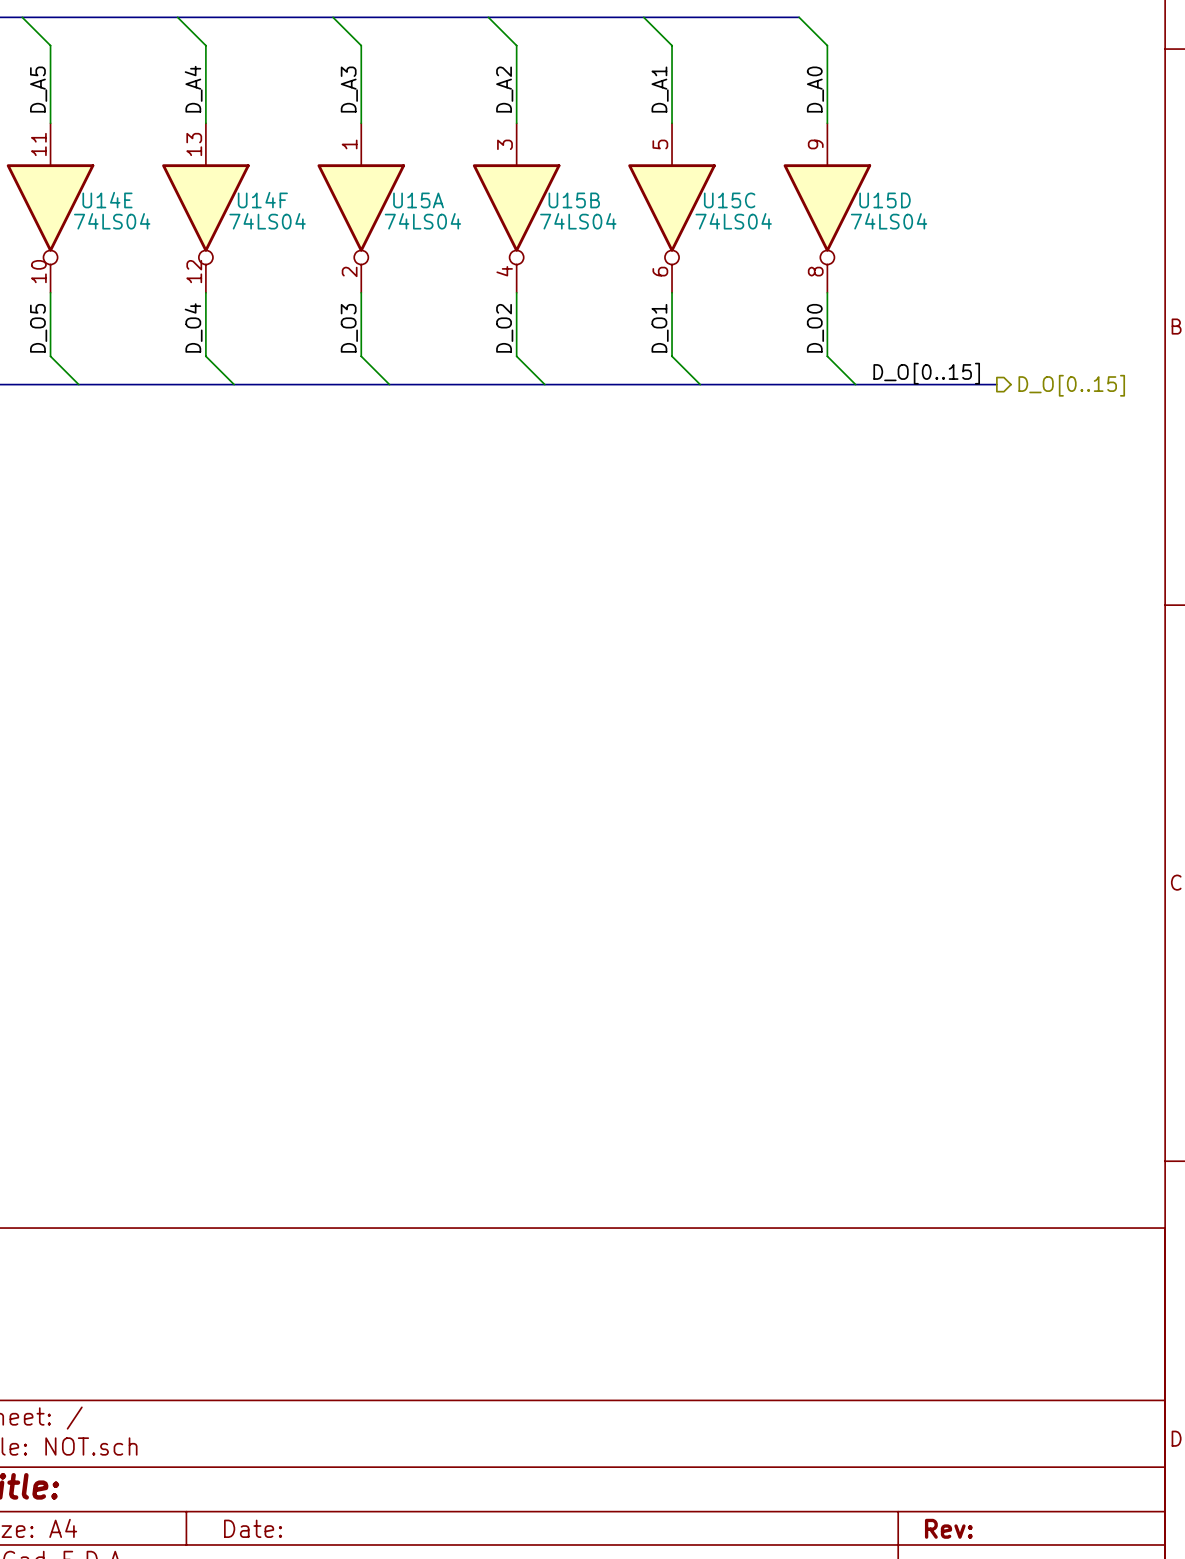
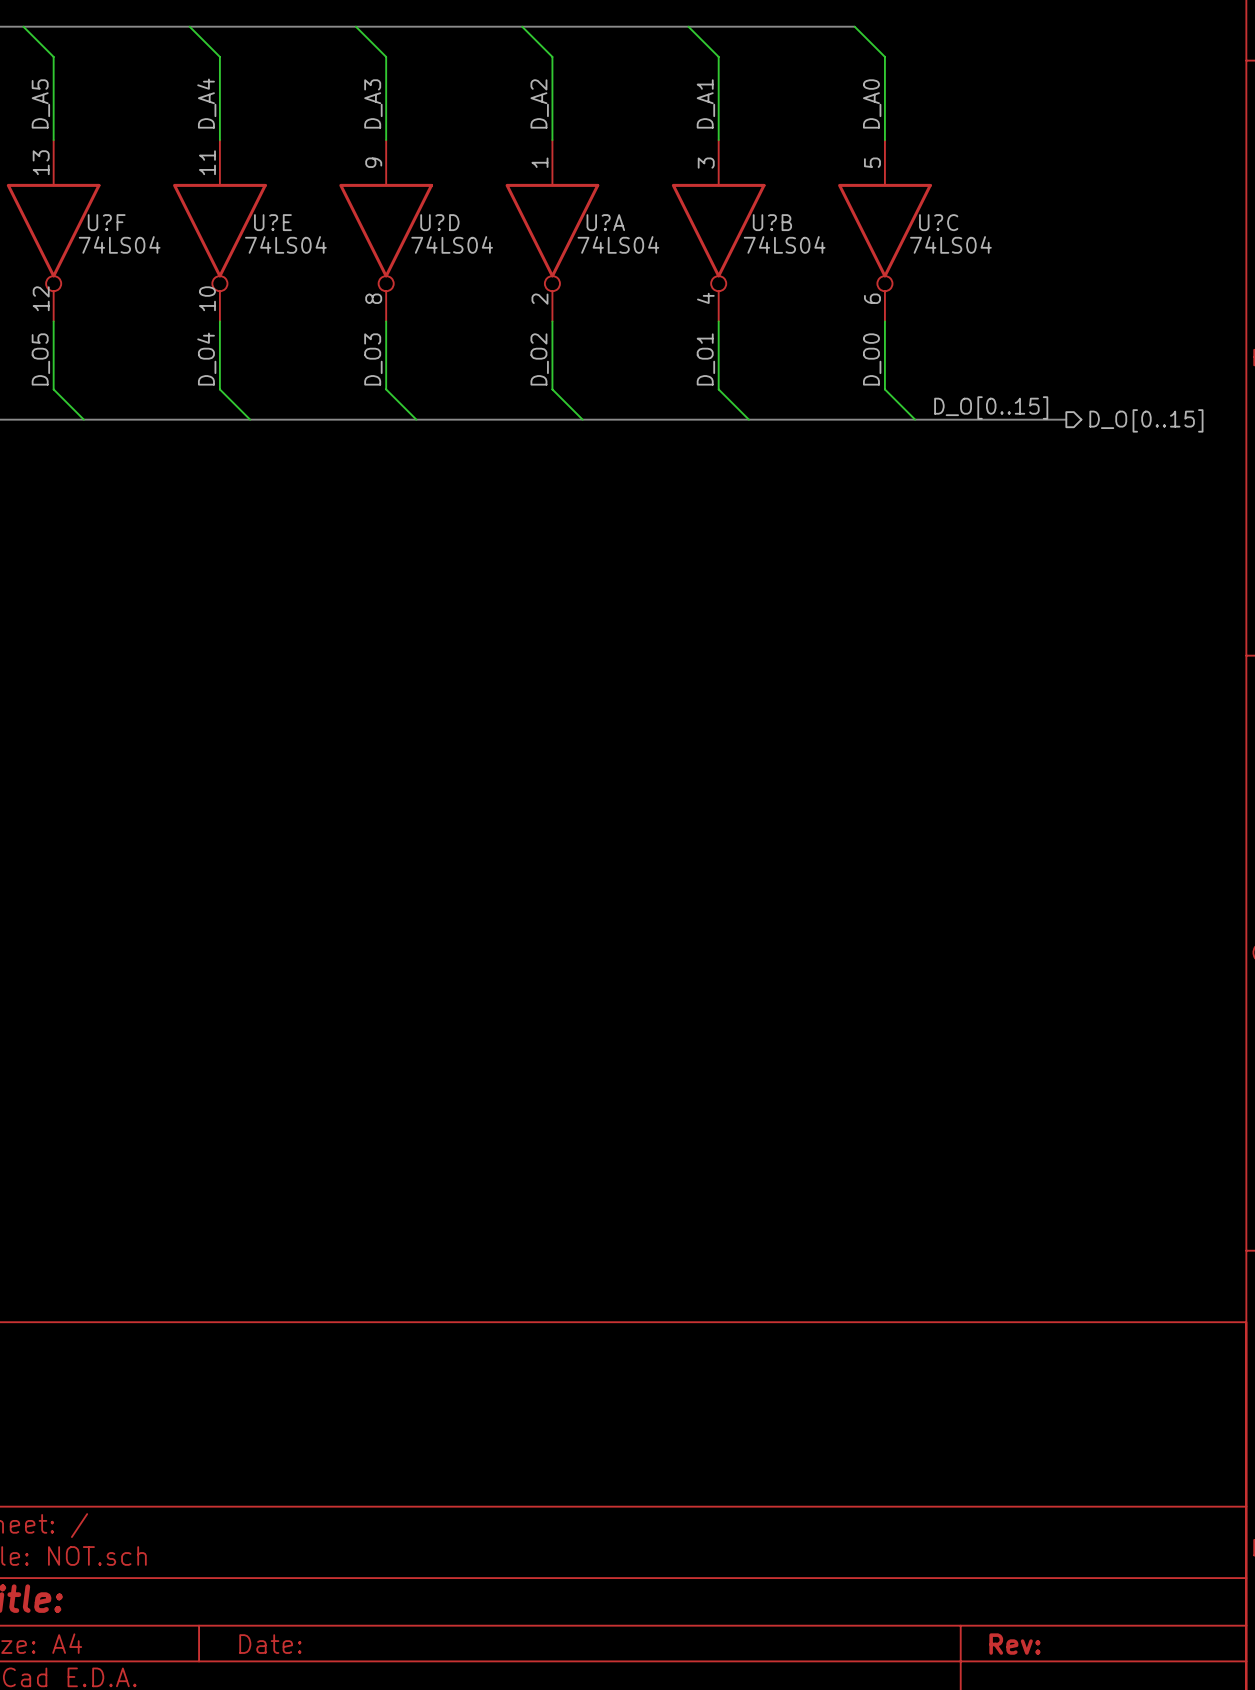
U14E pin number: 11 (38, 144) -> 13 (41, 162)
U14F pin number: 13 (194, 144) -> 11 (207, 162)
U15A pin number: 1 (349, 144) -> 9 (373, 162)
U15B pin number: 3 (504, 144) -> 1 (539, 162)
U15C pin number: 5 (660, 144) -> 3 (706, 163)
U15D pin number: 9 (815, 144) -> 5 (872, 162)
U14E name: U14E (107, 200) -> U?F (106, 222)
U14F name: U14F (262, 200) -> U?E (272, 222)
U15A name: U15A (418, 200) -> U?D (439, 222)
U15B name: U15B (574, 200) -> U?A (605, 222)
U15C name: U15C (729, 200) -> U?B (772, 222)
U15D name: U15D (885, 200) -> U?C (938, 222)
U14E pin number: 10 (38, 271) -> 12 (41, 298)
U14F pin number: 12 (194, 271) -> 10 (207, 298)
U15A pin number: 2 (349, 271) -> 8 (373, 298)
U15B pin number: 4 (504, 271) -> 2 (539, 299)
U15C pin number: 6 (660, 271) -> 4 (705, 298)
U15D pin number: 8 (815, 271) -> 6 (872, 298)

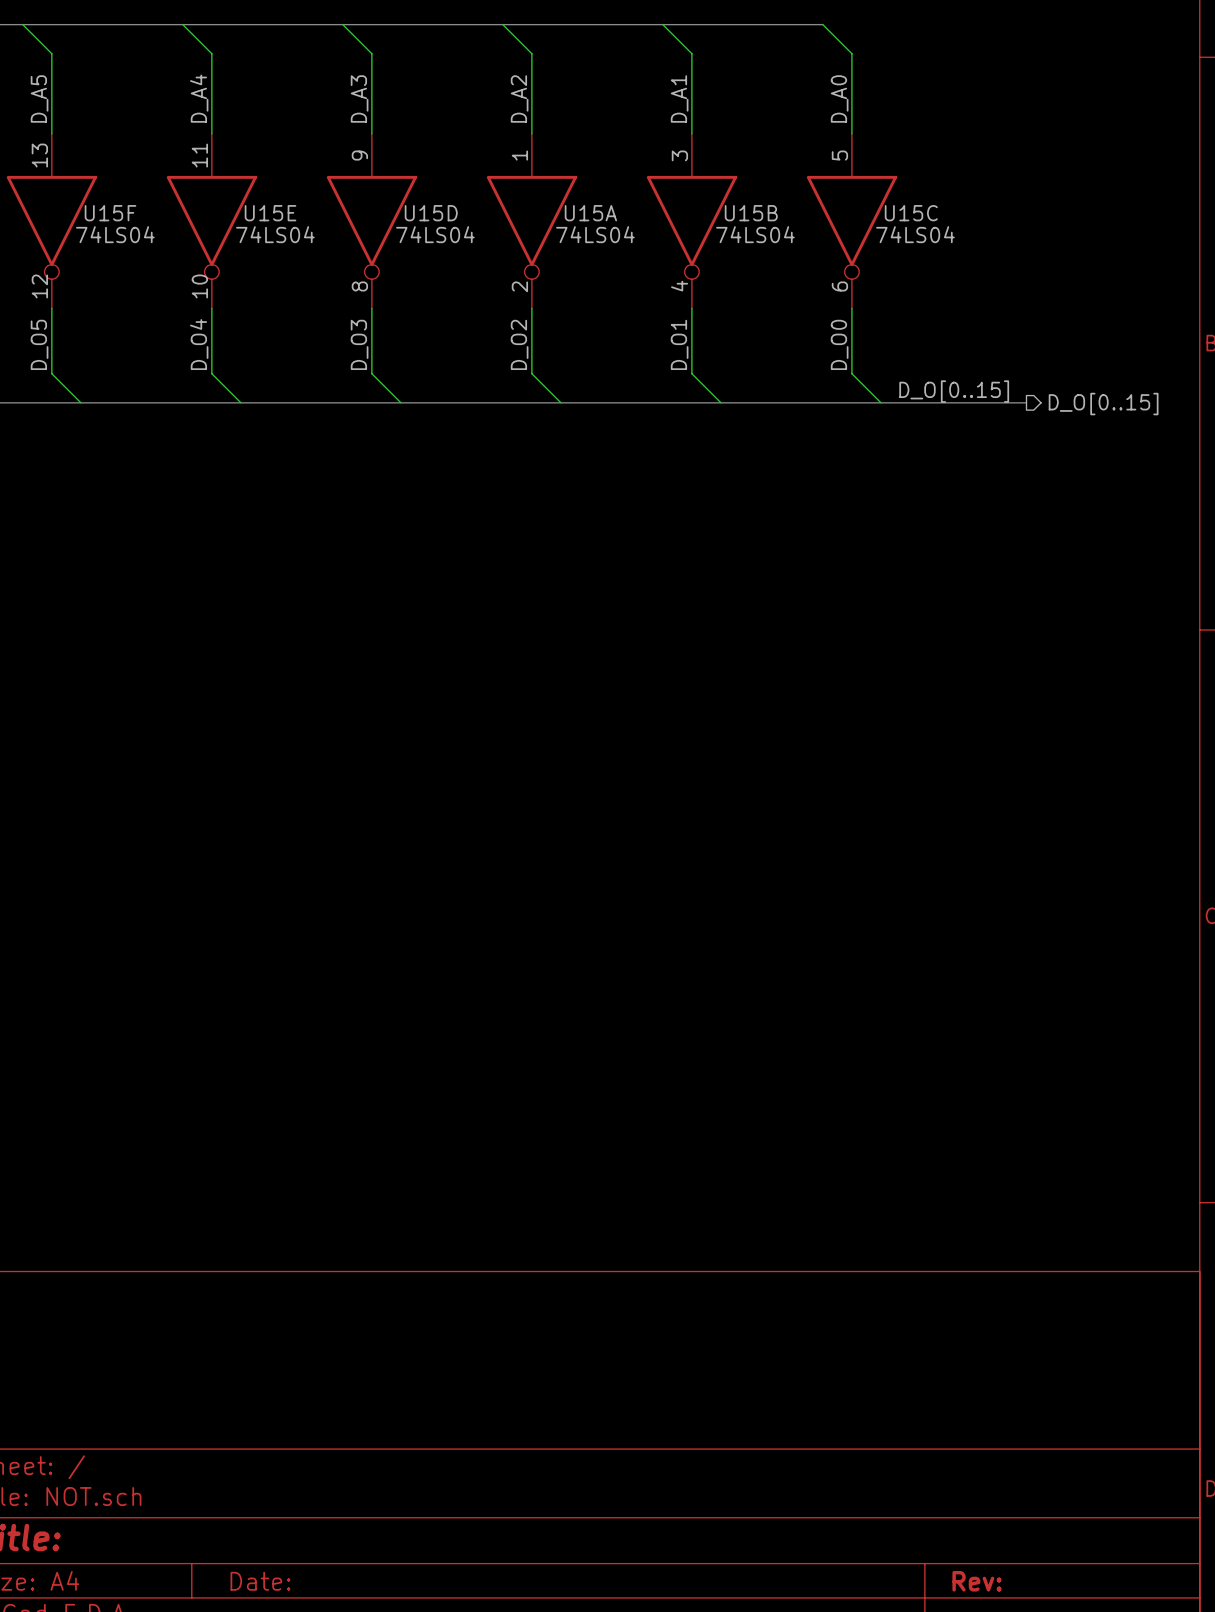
U?F name: U?F (106, 222) -> U15F (110, 213)
U?E name: U?E (272, 222) -> U15E (270, 213)
U?D name: U?D (439, 222) -> U15D (431, 213)
U?A name: U?A (605, 222) -> U15A (590, 213)
U?B name: U?B (772, 222) -> U15B (751, 213)
U?C name: U?C (938, 222) -> U15C (911, 213)

